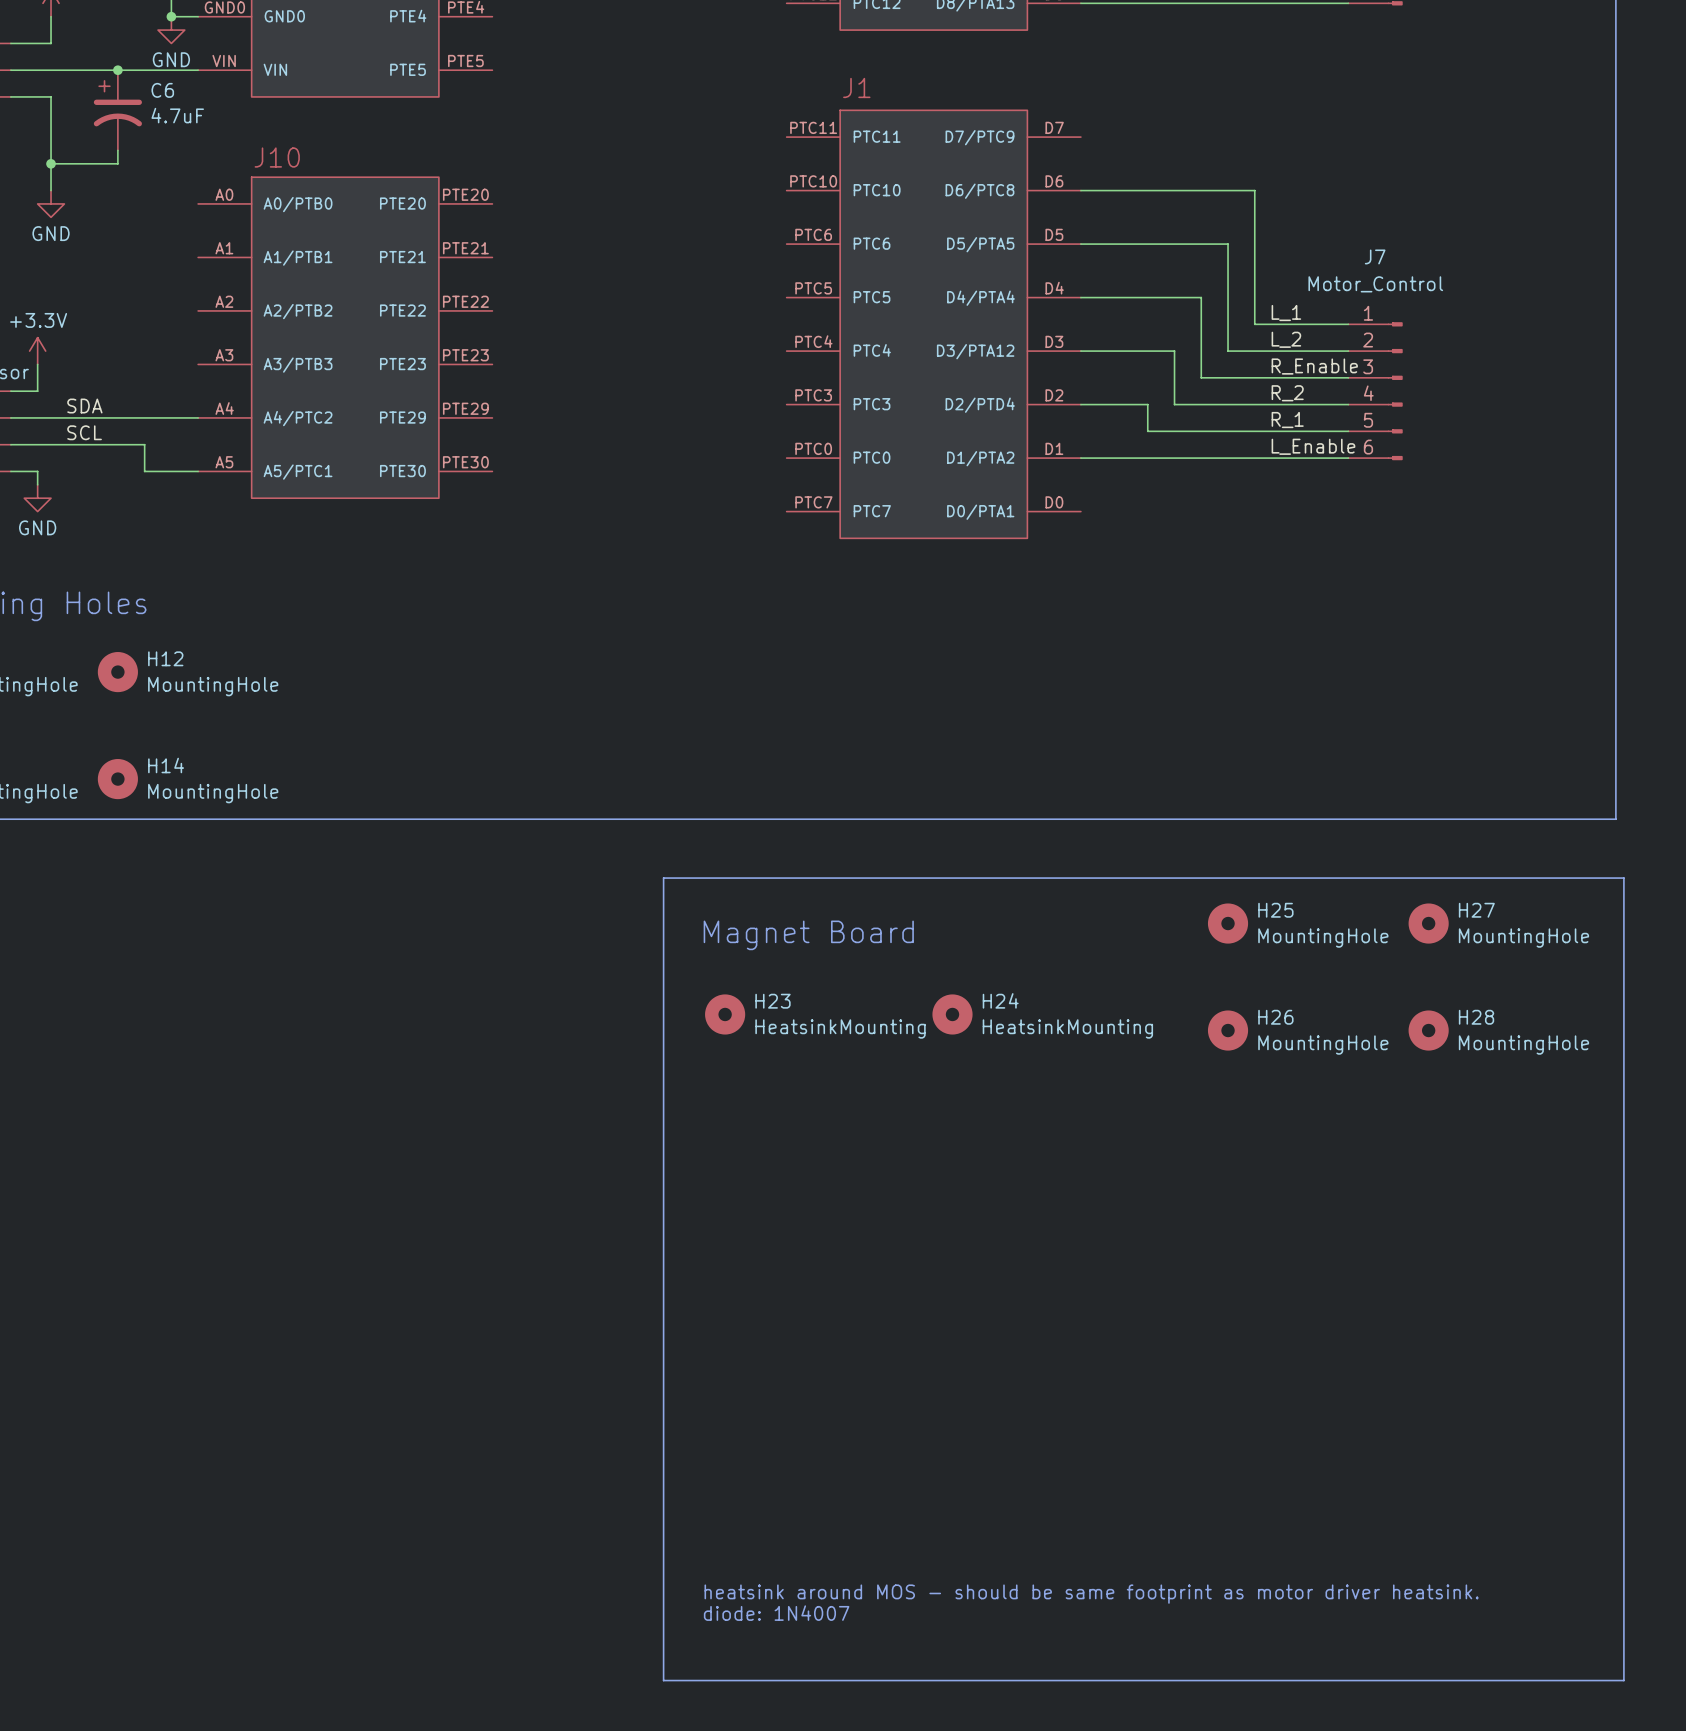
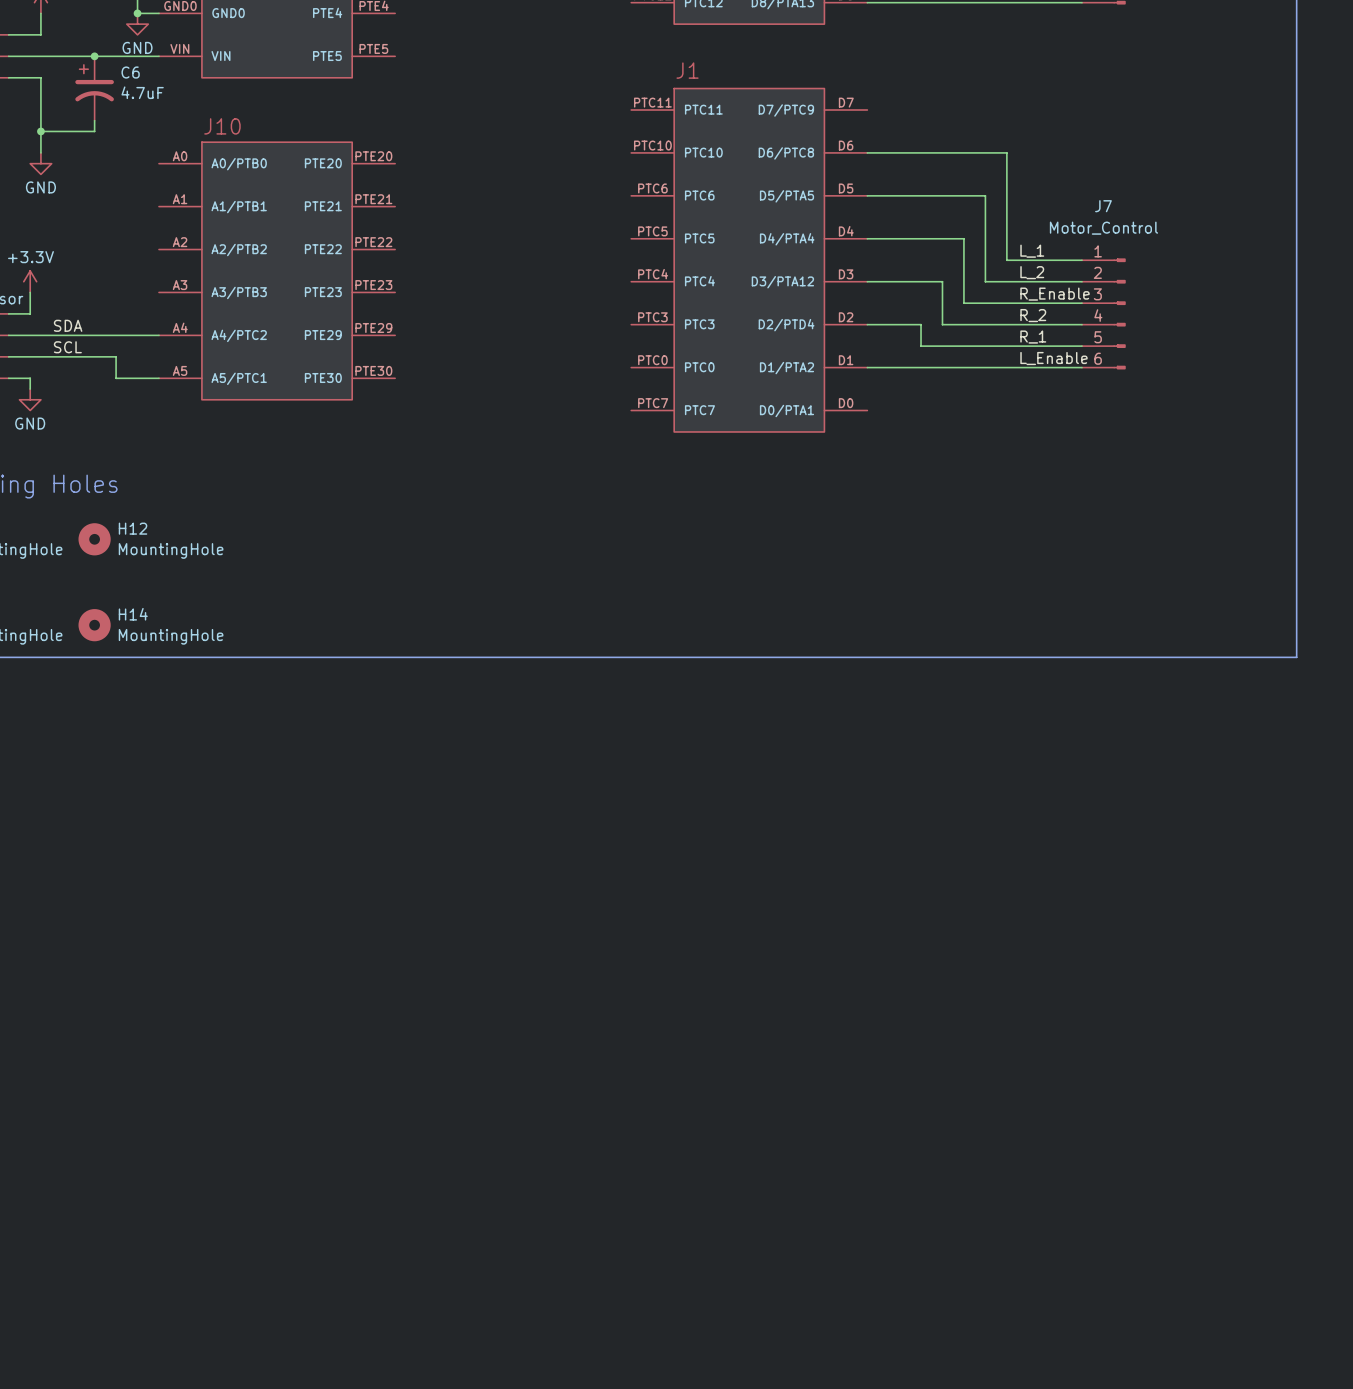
line: (663, 878) (1623, 878) (1623, 1680) (663, 1680) (663, 878) -> none
H25: MountingHole (1228, 923) -> none
H27: MountingHole (1428, 923) -> none
text: Magnet Board (808, 935) -> none
H23: HeatsinkMounting (725, 1014) -> none
H24: HeatsinkMounting (952, 1014) -> none
H26: MountingHole (1228, 1030) -> none
H28: MountingHole (1428, 1030) -> none
text: heatsink around MOS - should be same footprint as motor driver heatsink. (1091, 1594) -> none
text: diode: 1N4007 (776, 1613) -> none

